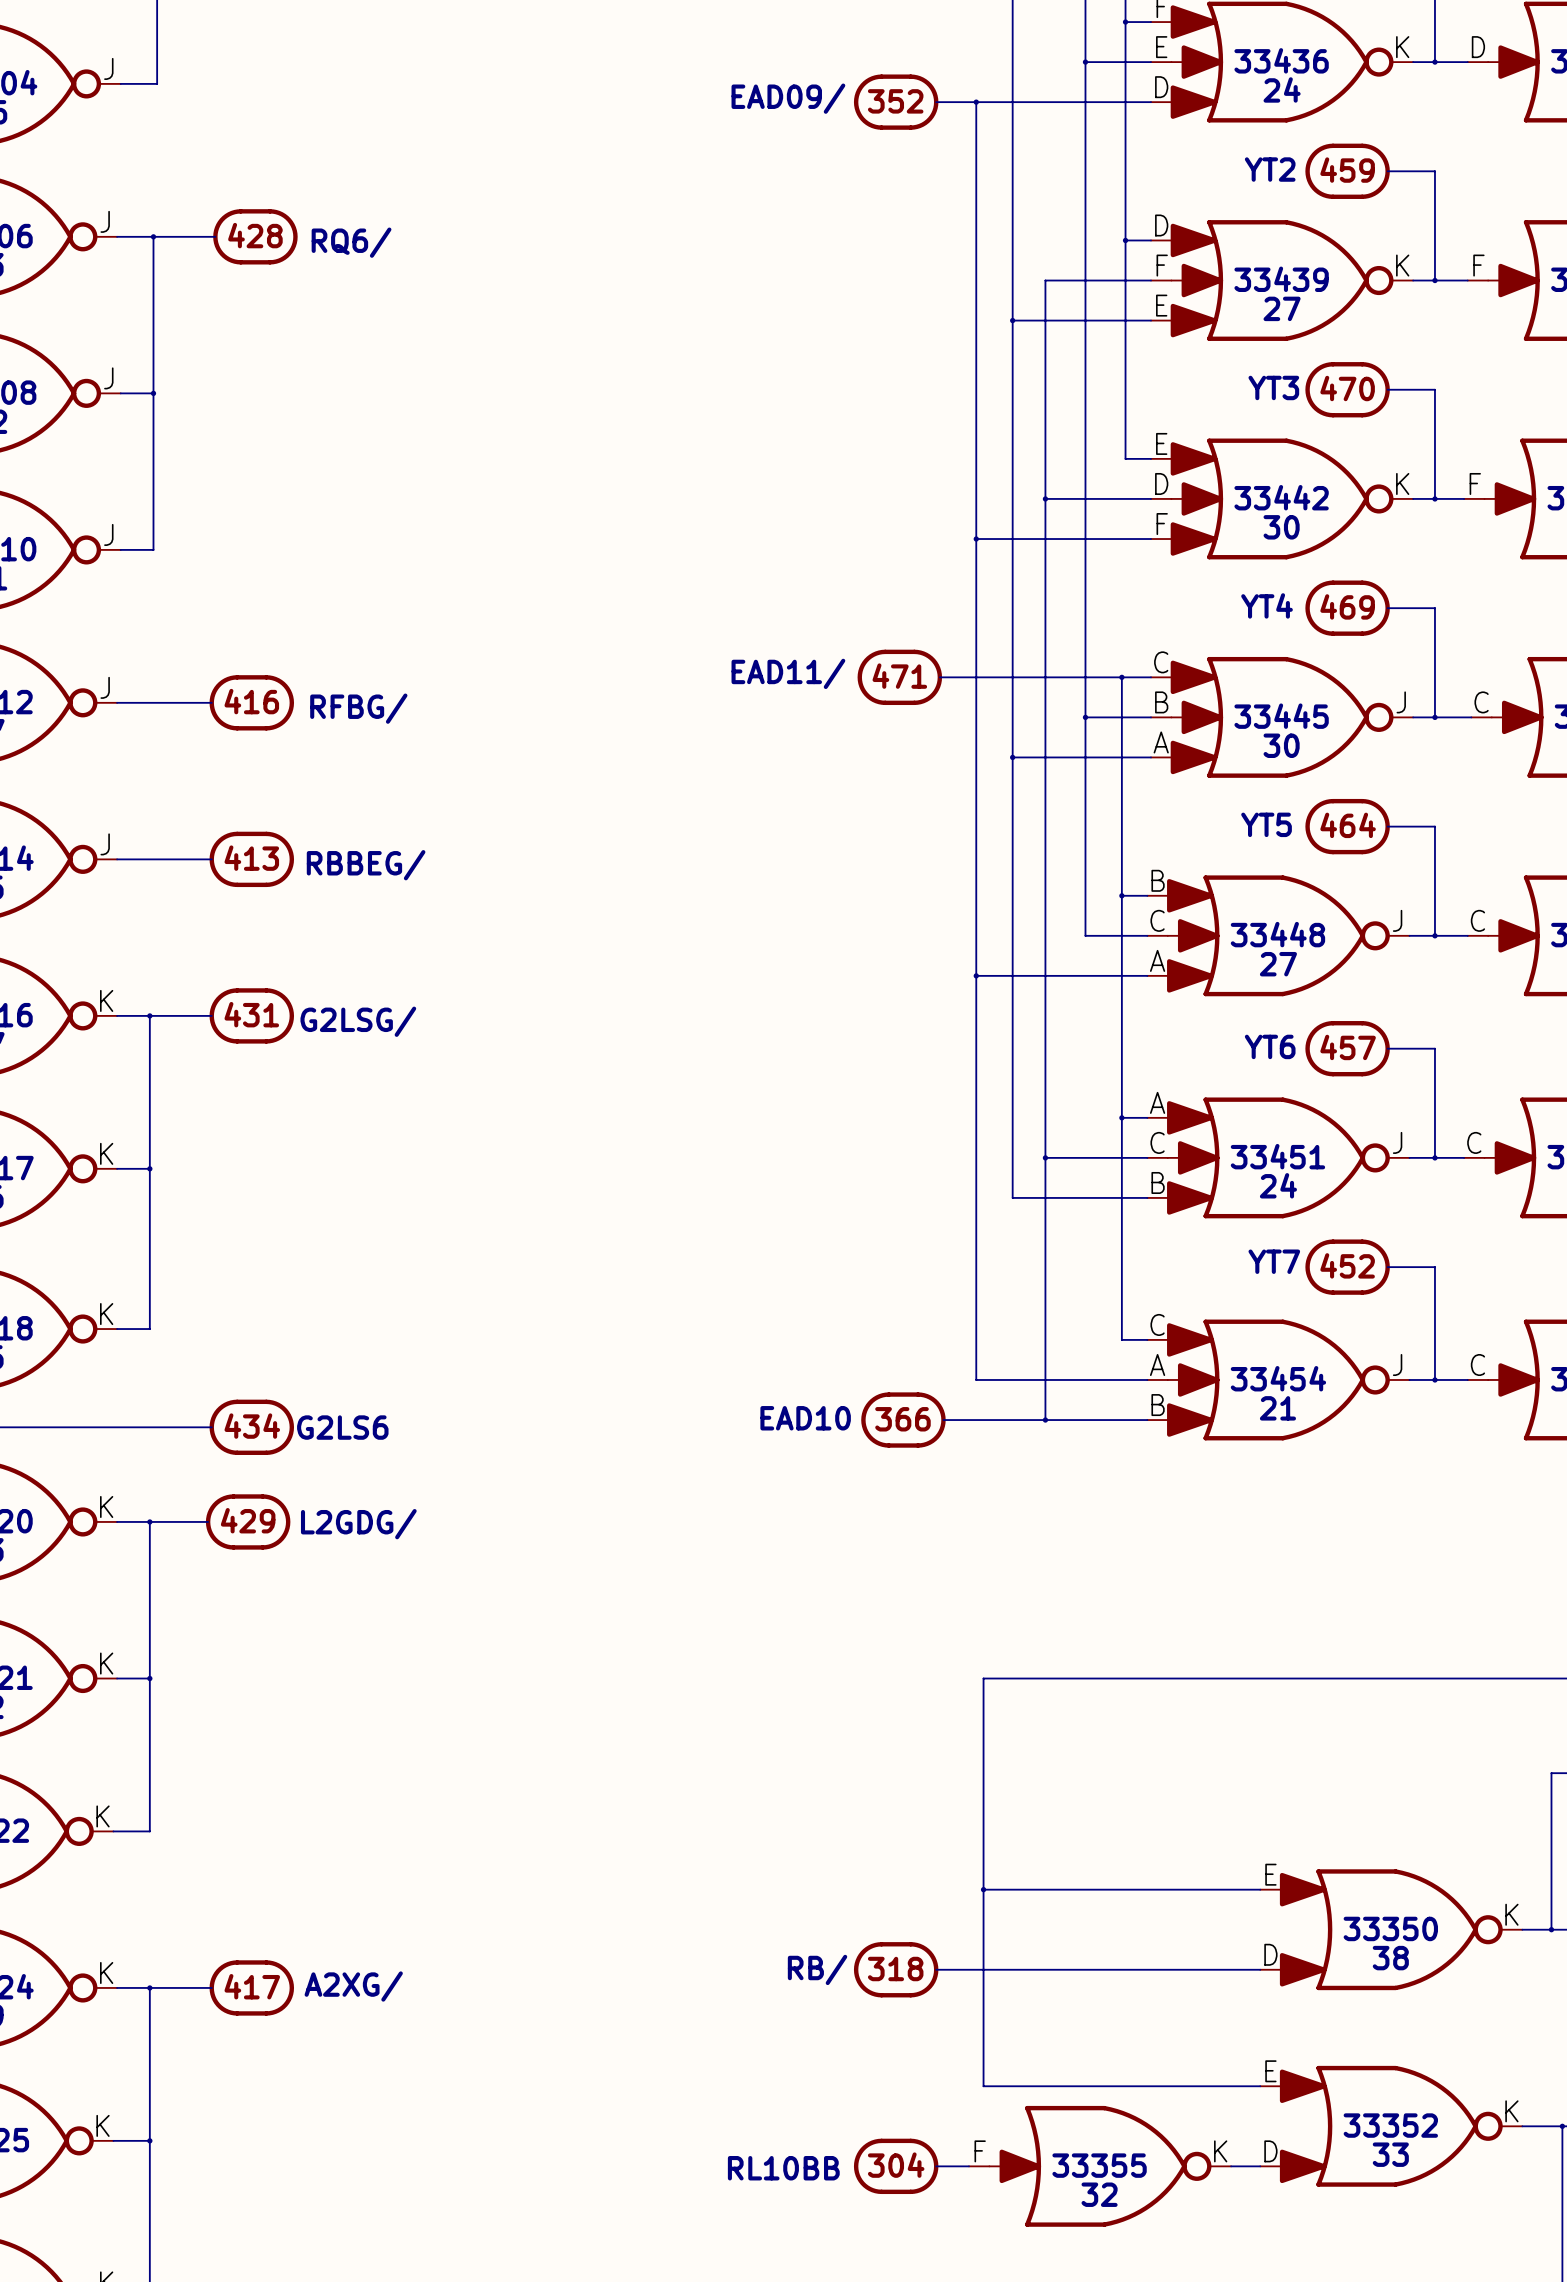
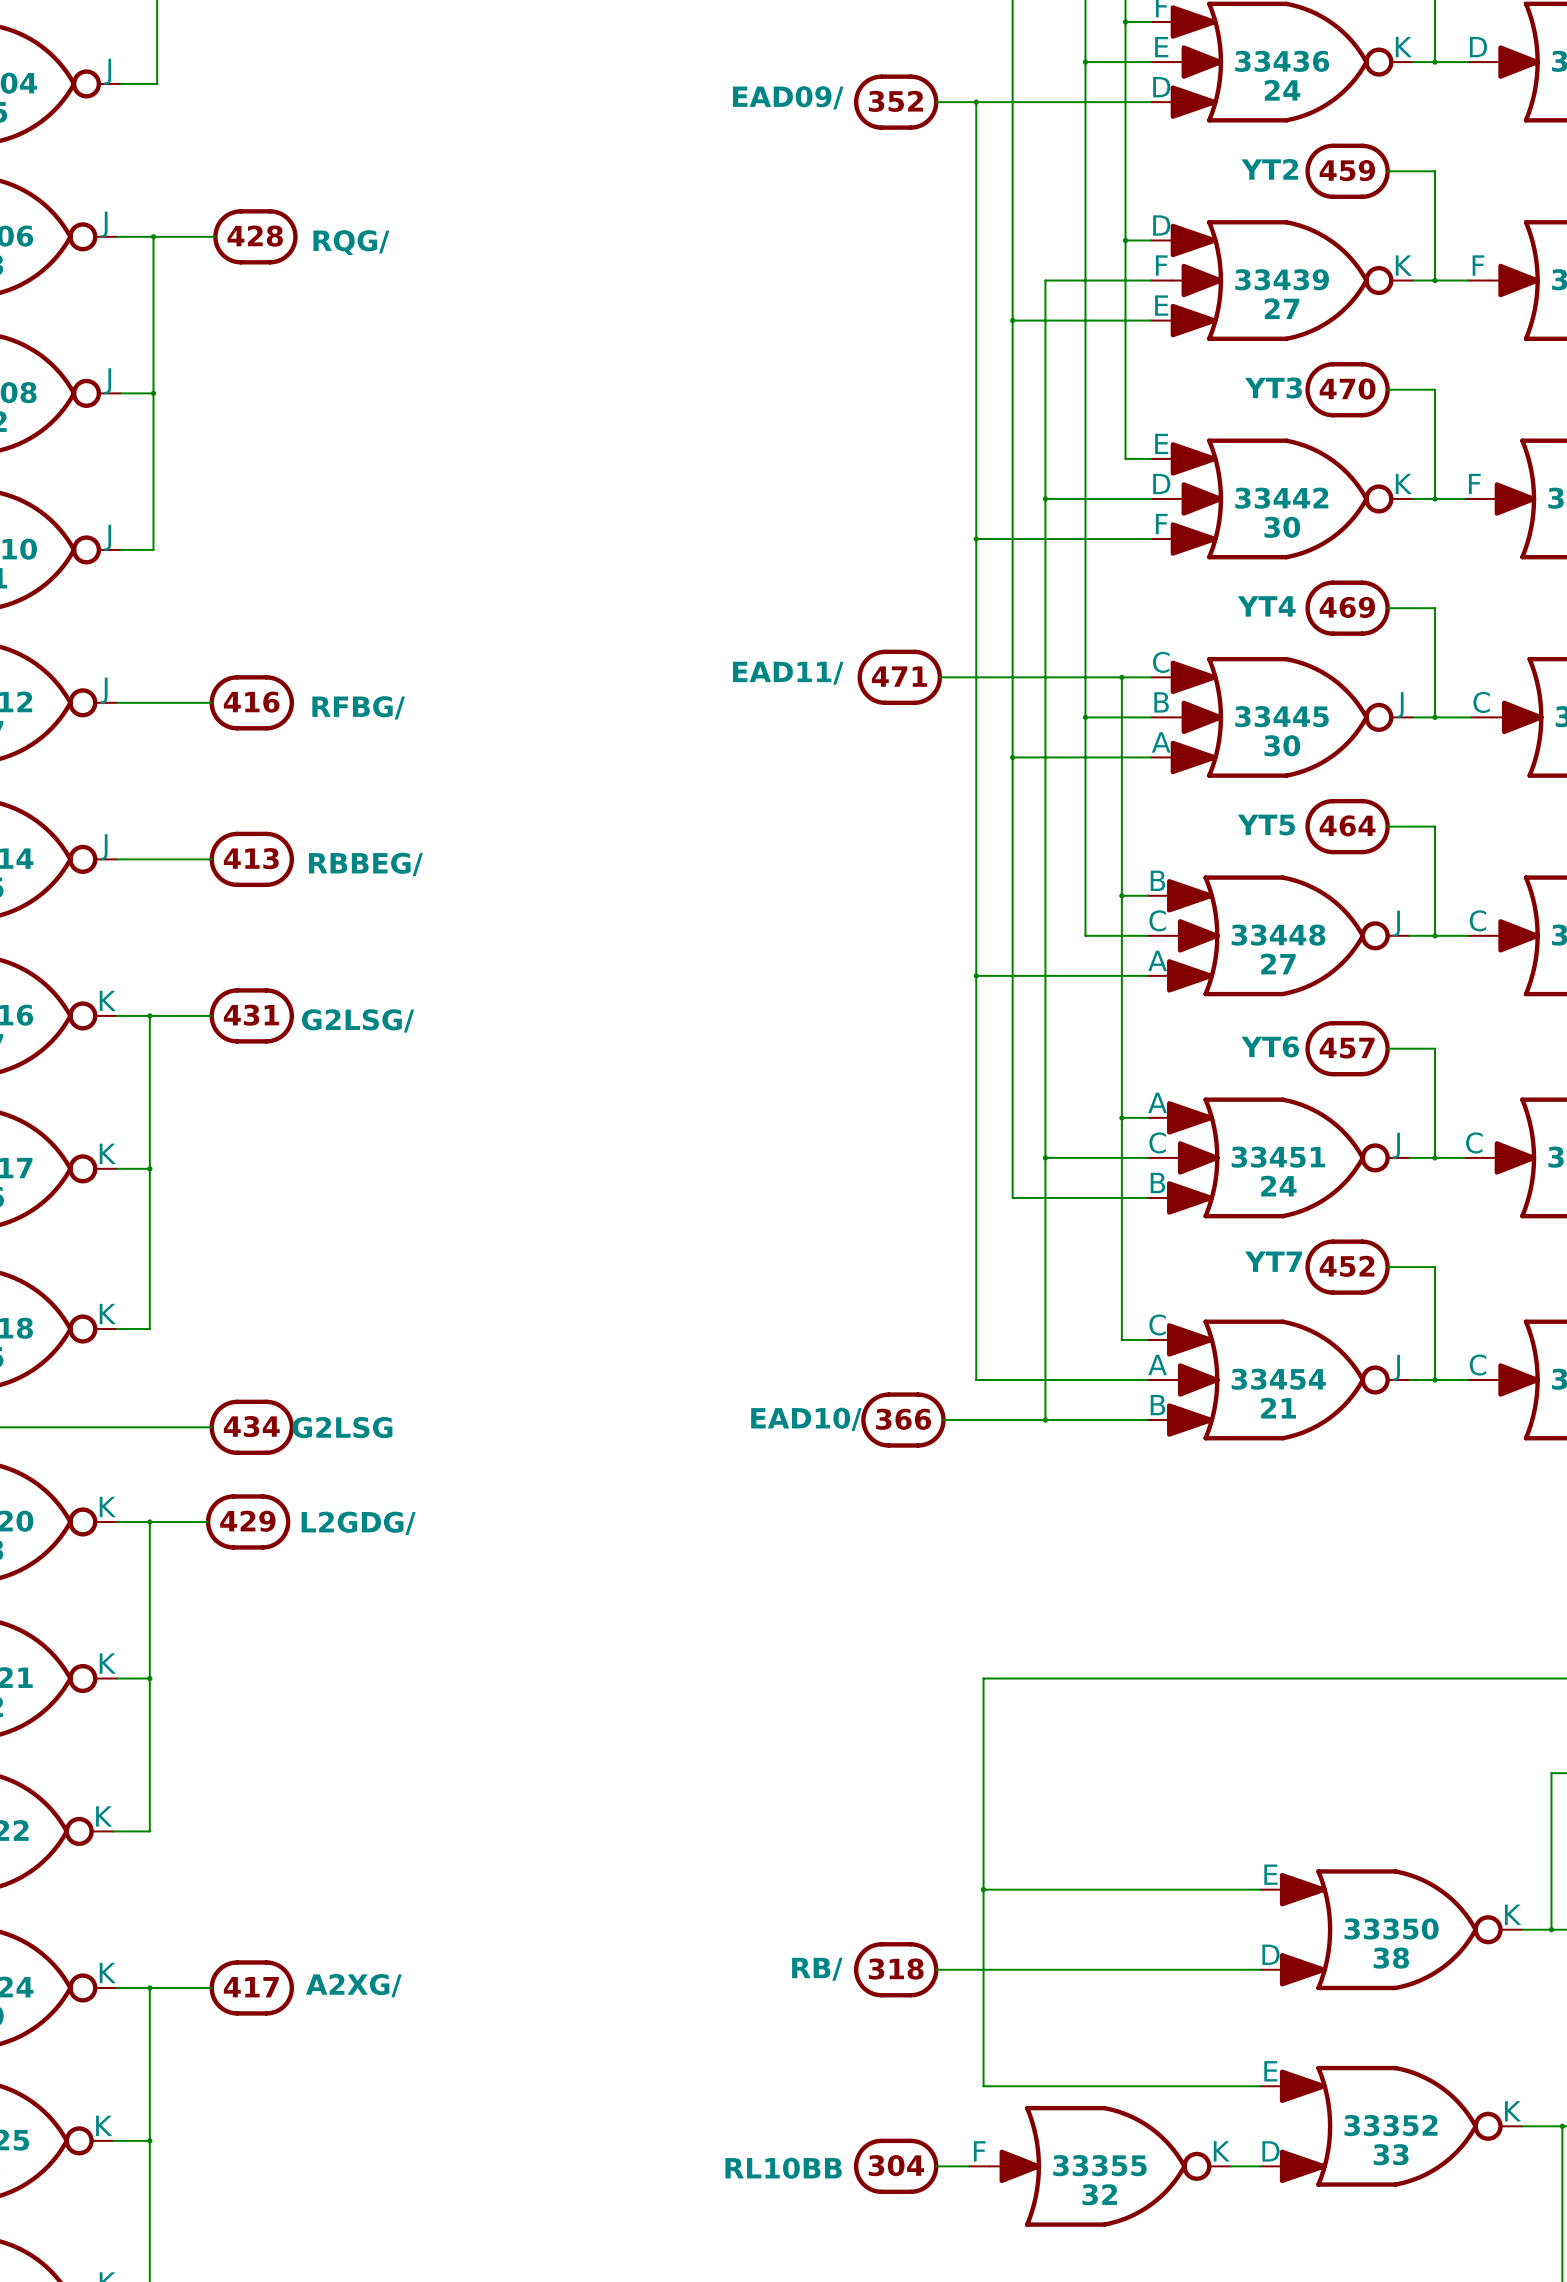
part text: RQ6/ (351, 242) -> RQG/ (351, 242)
part text: EAD10 (805, 1418) -> EAD10/ (806, 1419)
part text: G2LS6 (342, 1427) -> G2LSG (342, 1427)

